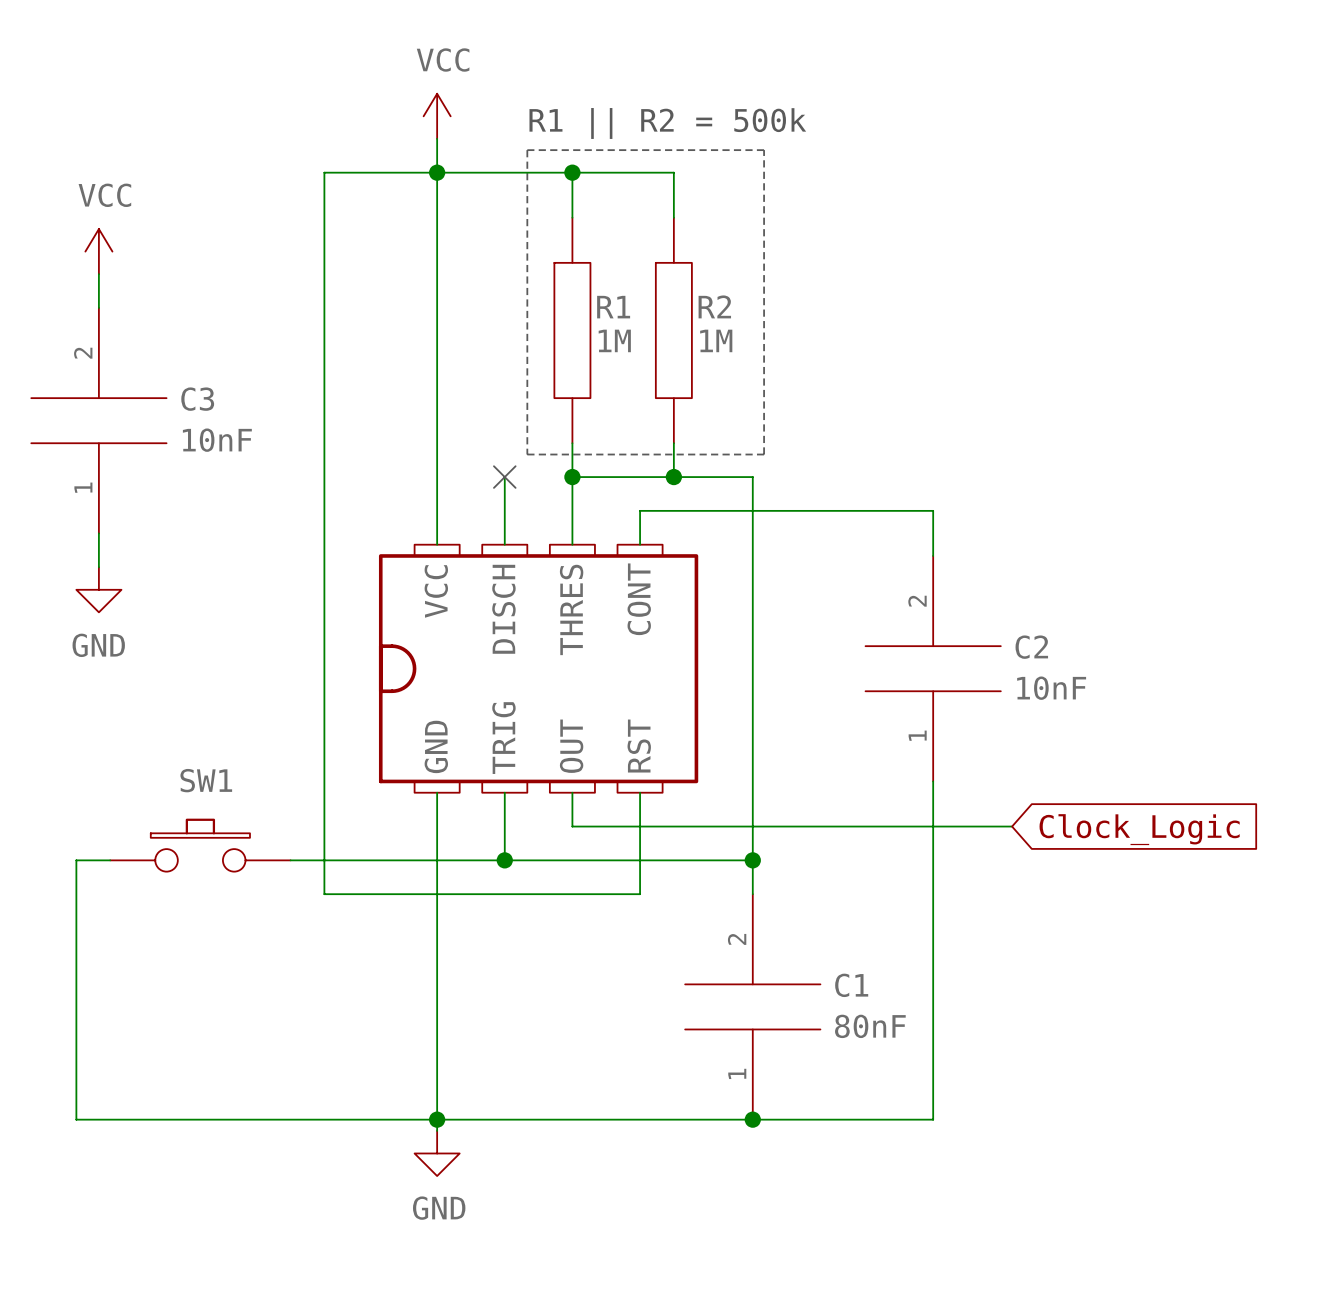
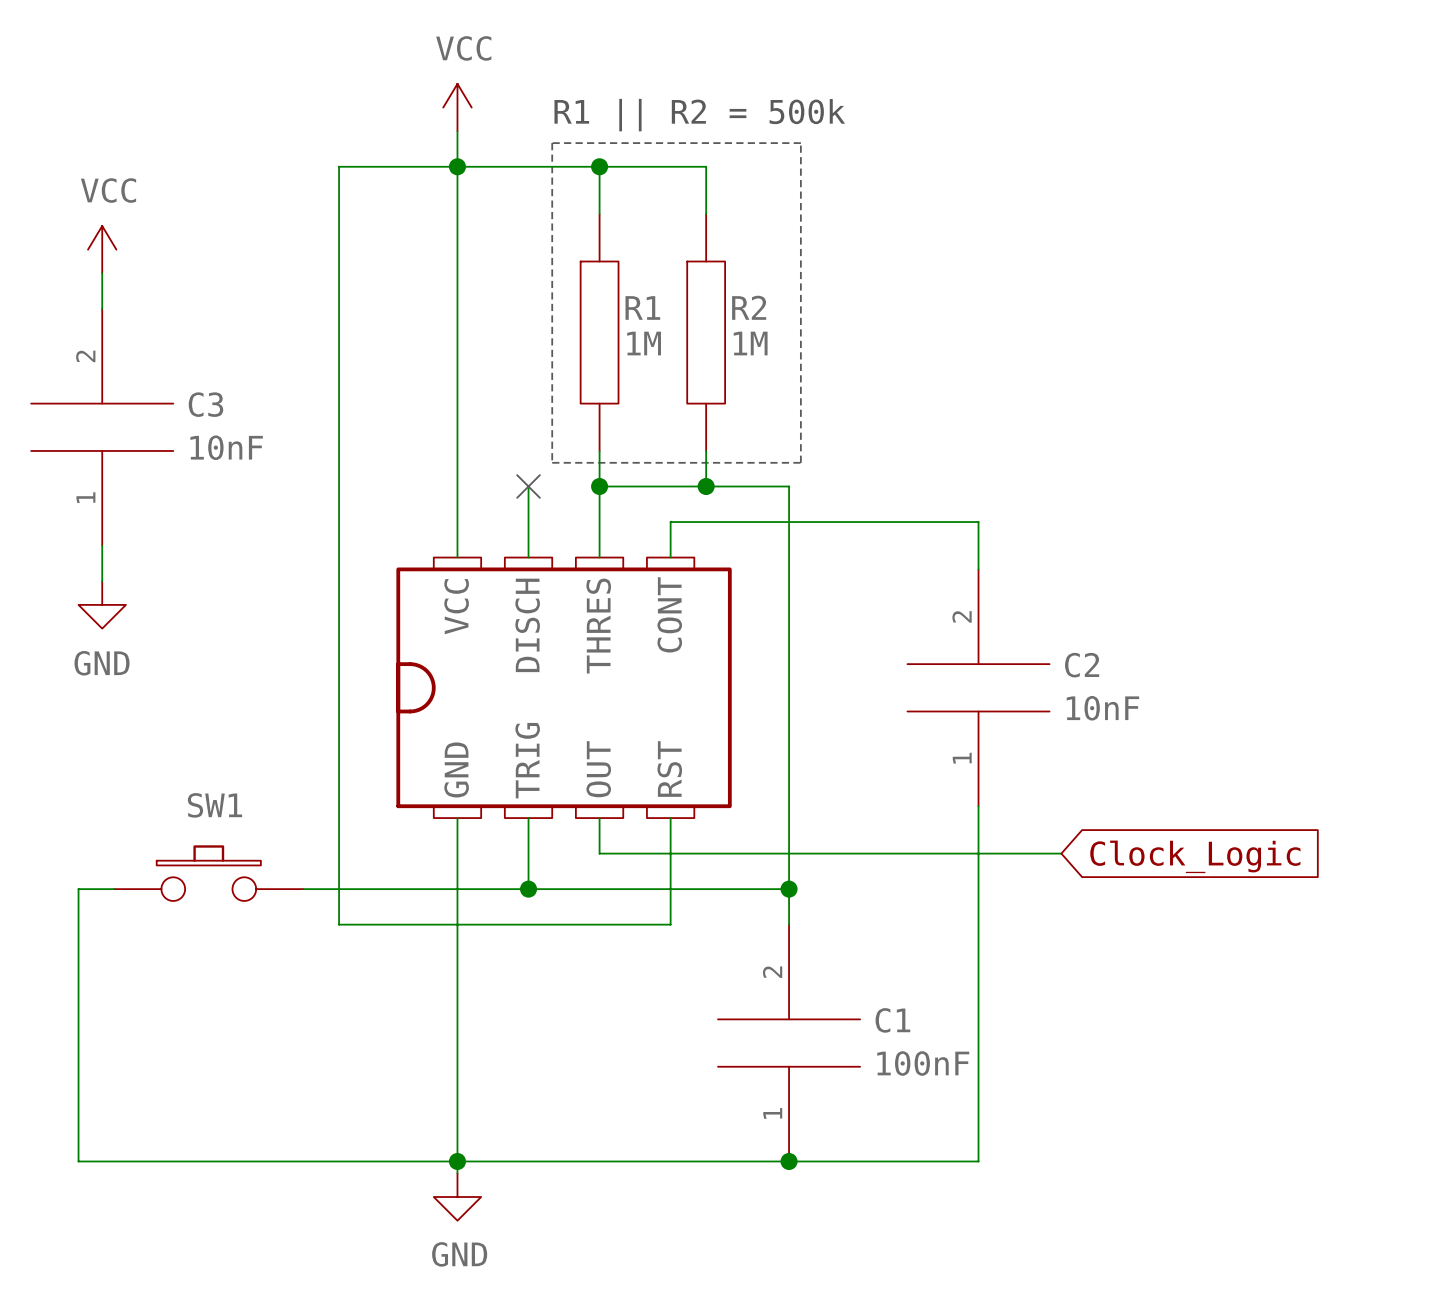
C1 value: 80nF (870, 1026) -> 100nF (923, 1063)

